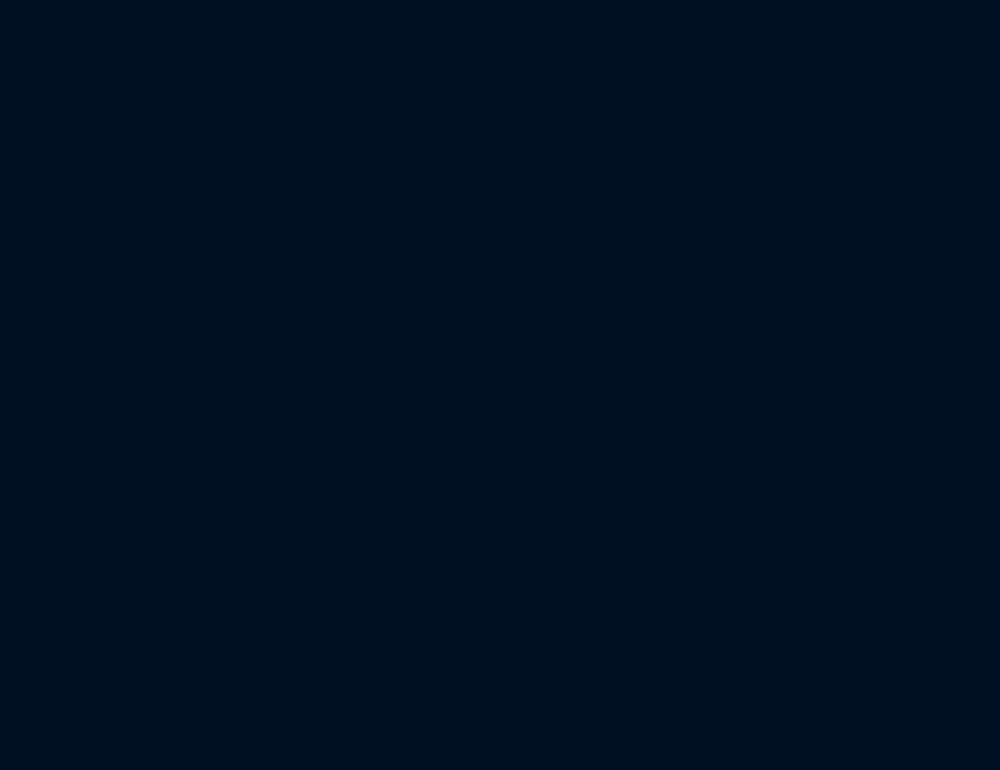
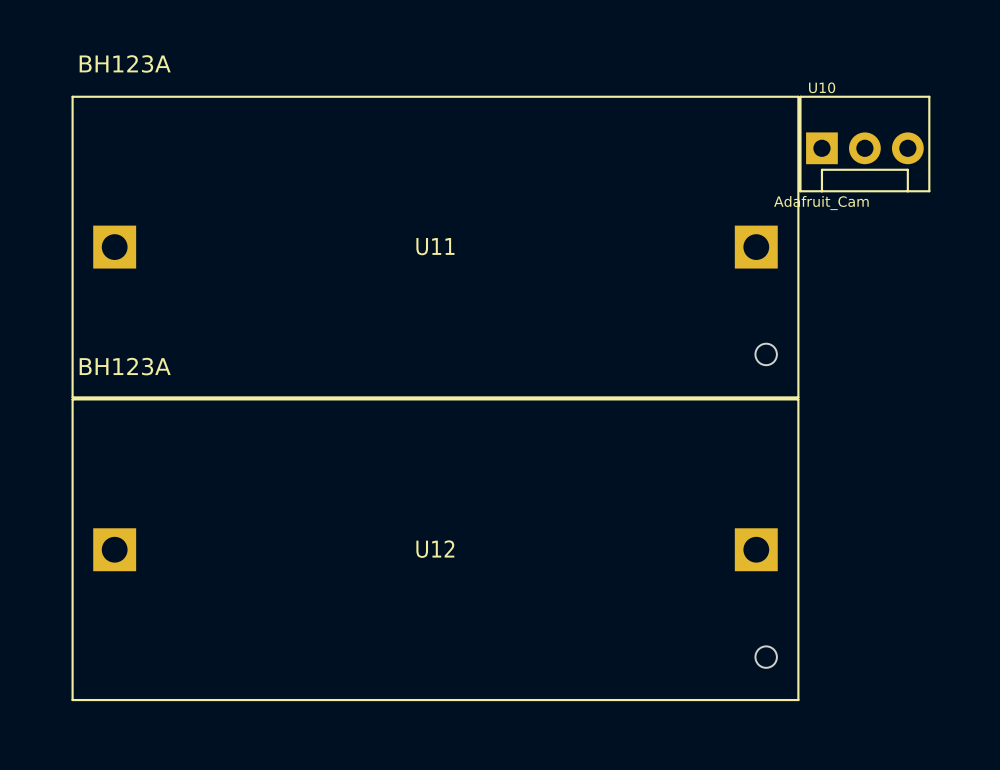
U10: none -> Adafruit_Cam (864, 144)
U11: none -> BH123A (435, 247)
U12: none -> BH123A (435, 549)

